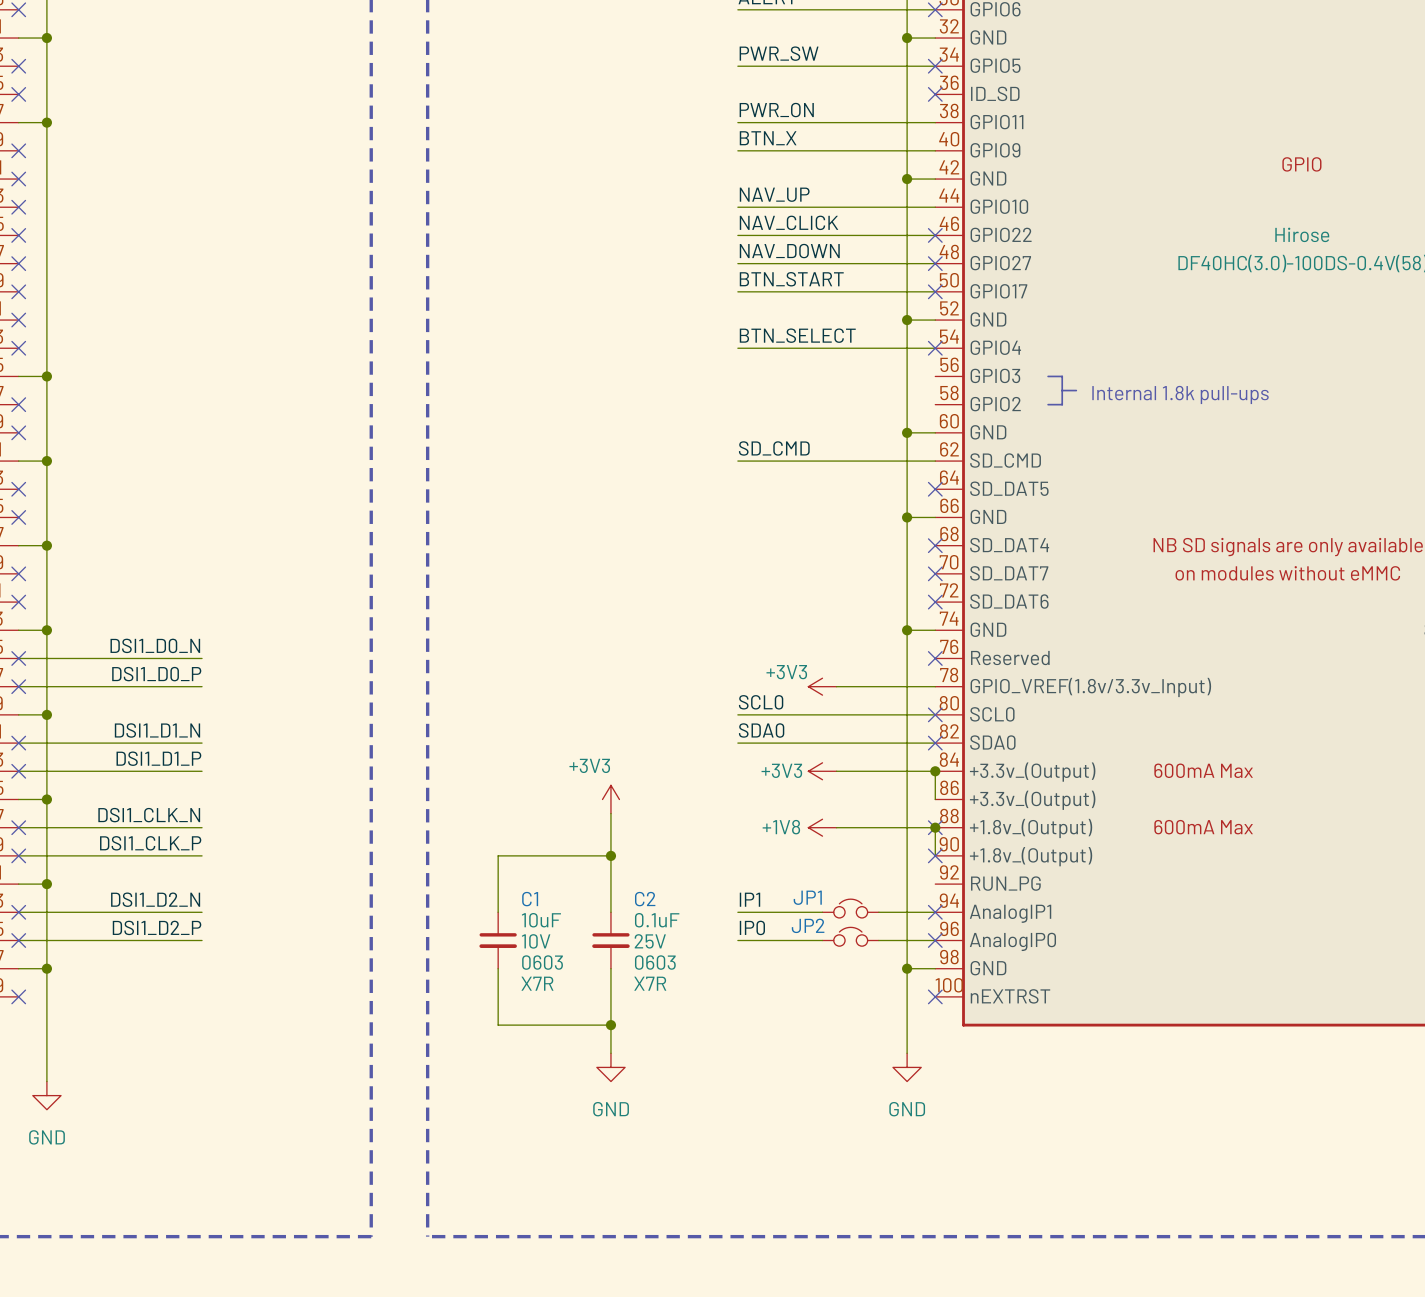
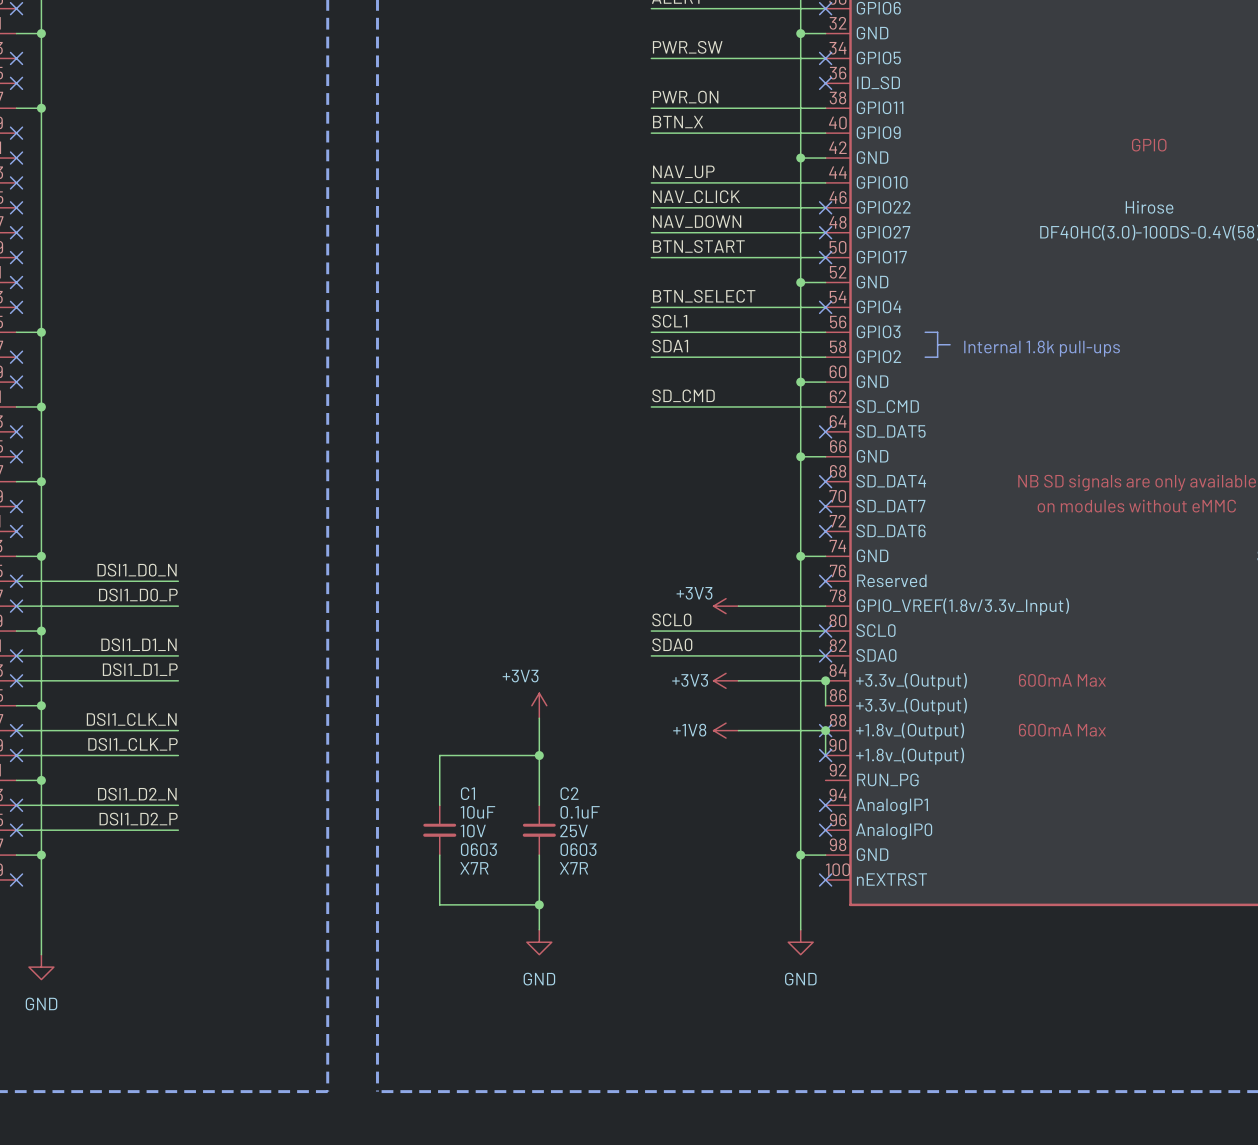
label: none -> SCL1 (669, 321)
wire: none -> (651, 332) (825, 332)
label: none -> SDA1 (670, 346)
wire: none -> (651, 357) (825, 357)
label: IP1 (749, 899) -> none
JP1: (850, 908) -> none
wire: (737, 912) (822, 912) -> none
wire: (878, 912) (935, 912) -> none
label: IP0 (752, 927) -> none
JP2: (850, 936) -> none
wire: (737, 940) (822, 940) -> none
wire: (878, 940) (935, 940) -> none

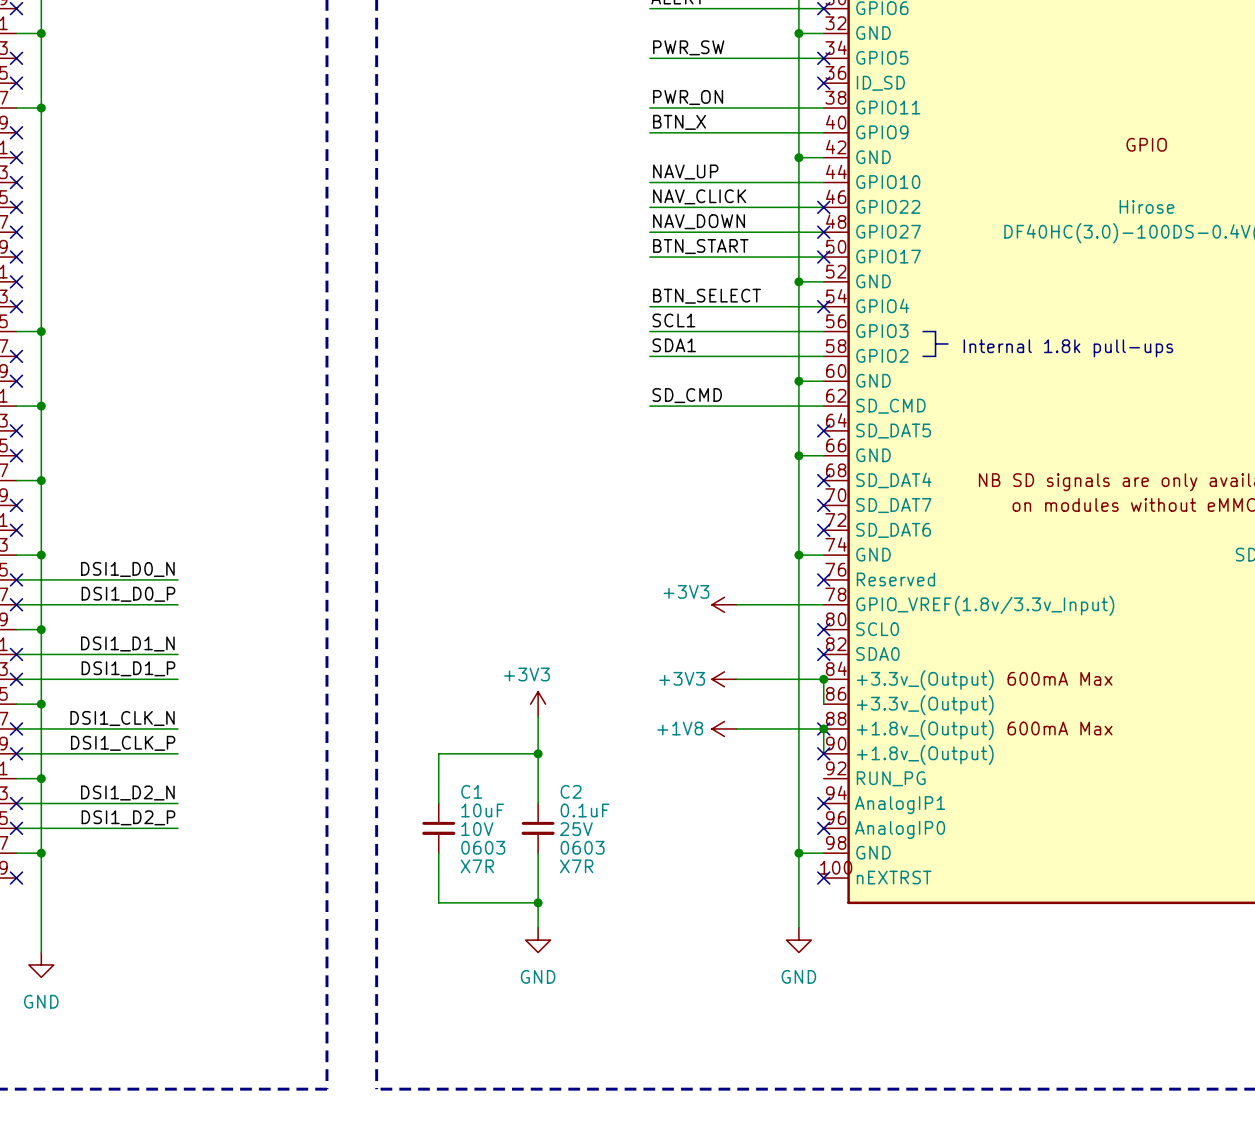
label: SCL0 (671, 619) -> none
wire: (651, 631) (825, 631) -> none
label: SDA0 (672, 644) -> none
wire: (651, 655) (825, 655) -> none

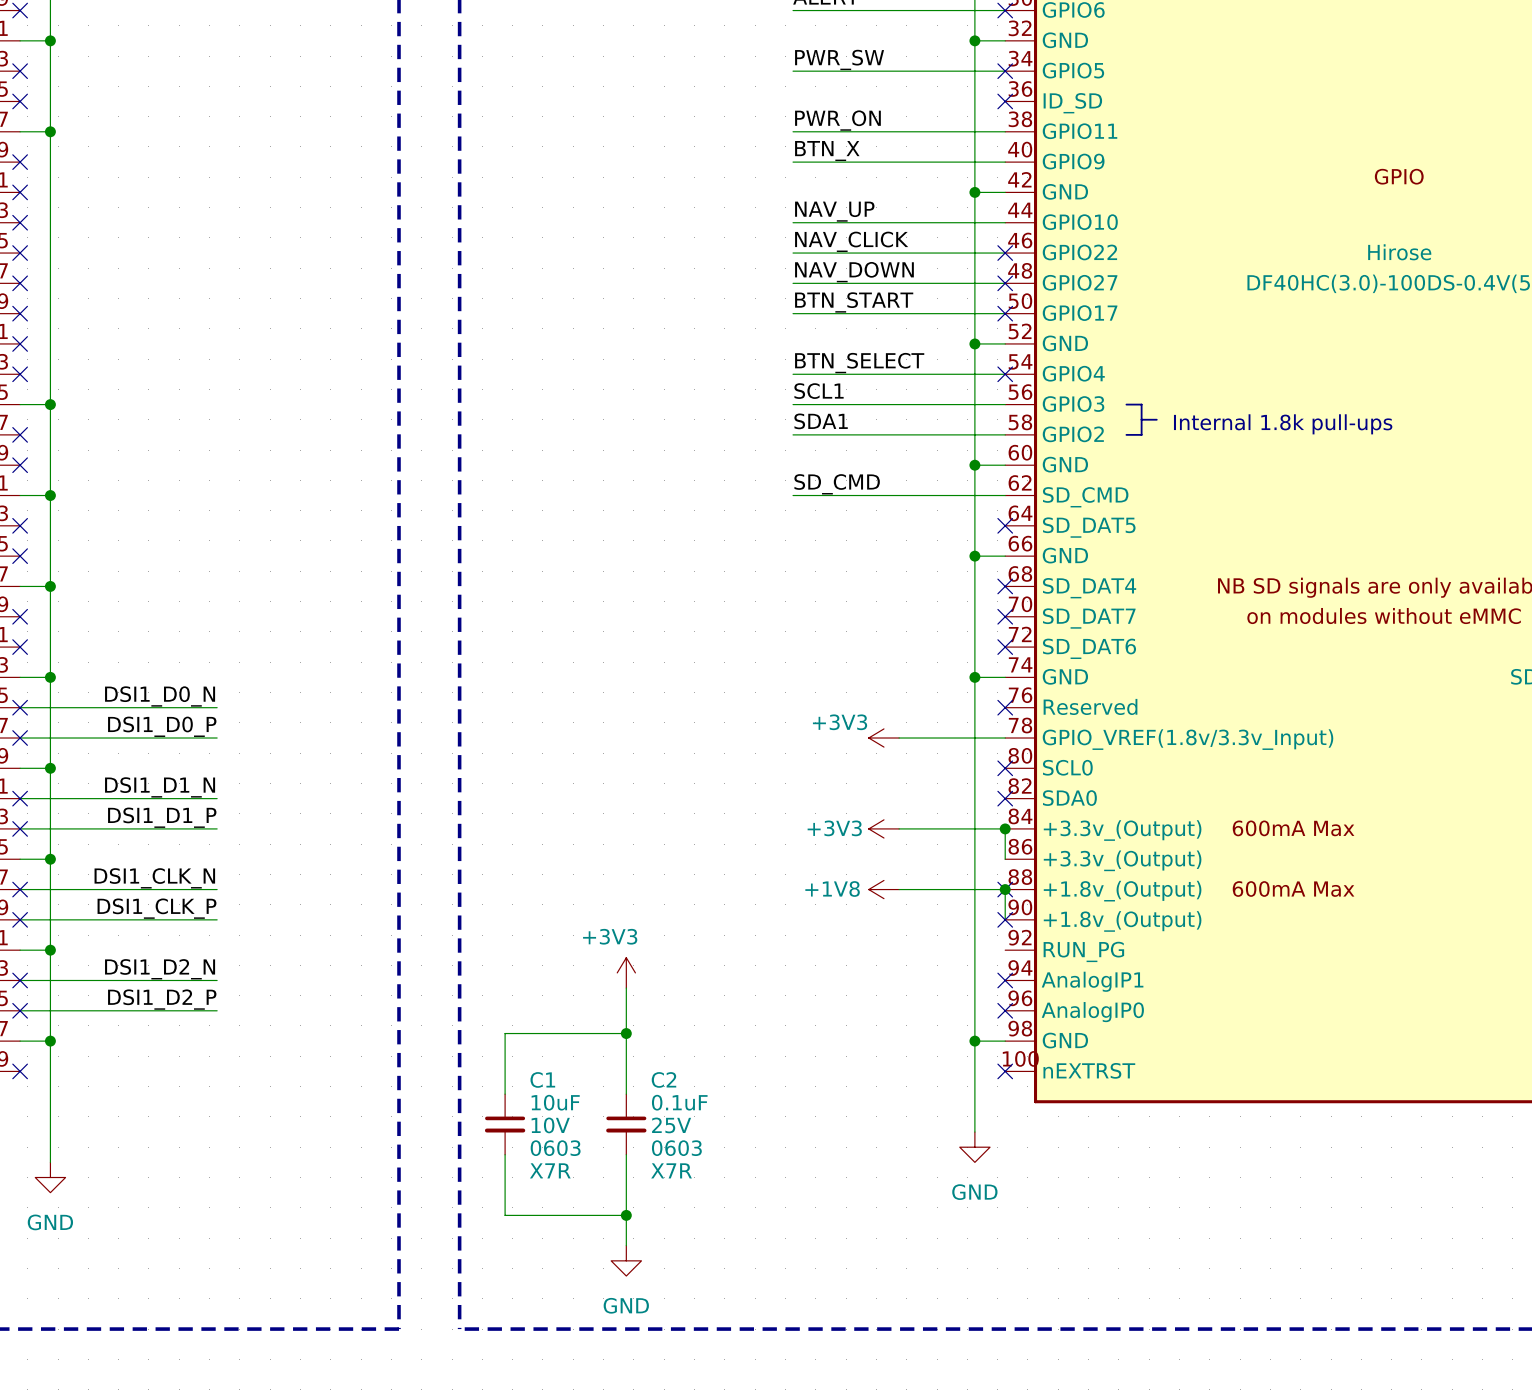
power symbol position: +3V3 (538, 704) -> +3V3 (626, 972)
wire: (538, 716) (538, 803) -> (626, 988) (626, 1094)
wire: (538, 753) (438, 753) (438, 803) -> (626, 1033) (505, 1033) (505, 1094)
junction: (538, 753) -> none
C1 position: (438, 828) -> (505, 1124)
C2 position: (538, 828) -> (626, 1124)
junction: none -> (626, 1033)
wire: (438, 853) (438, 902) (538, 902) -> (505, 1154) (505, 1215) (626, 1215)
wire: (538, 853) (538, 927) -> (626, 1154) (626, 1245)
junction: (538, 902) -> none
power symbol position: GND (538, 940) -> GND (626, 1260)
junction: none -> (626, 1215)

